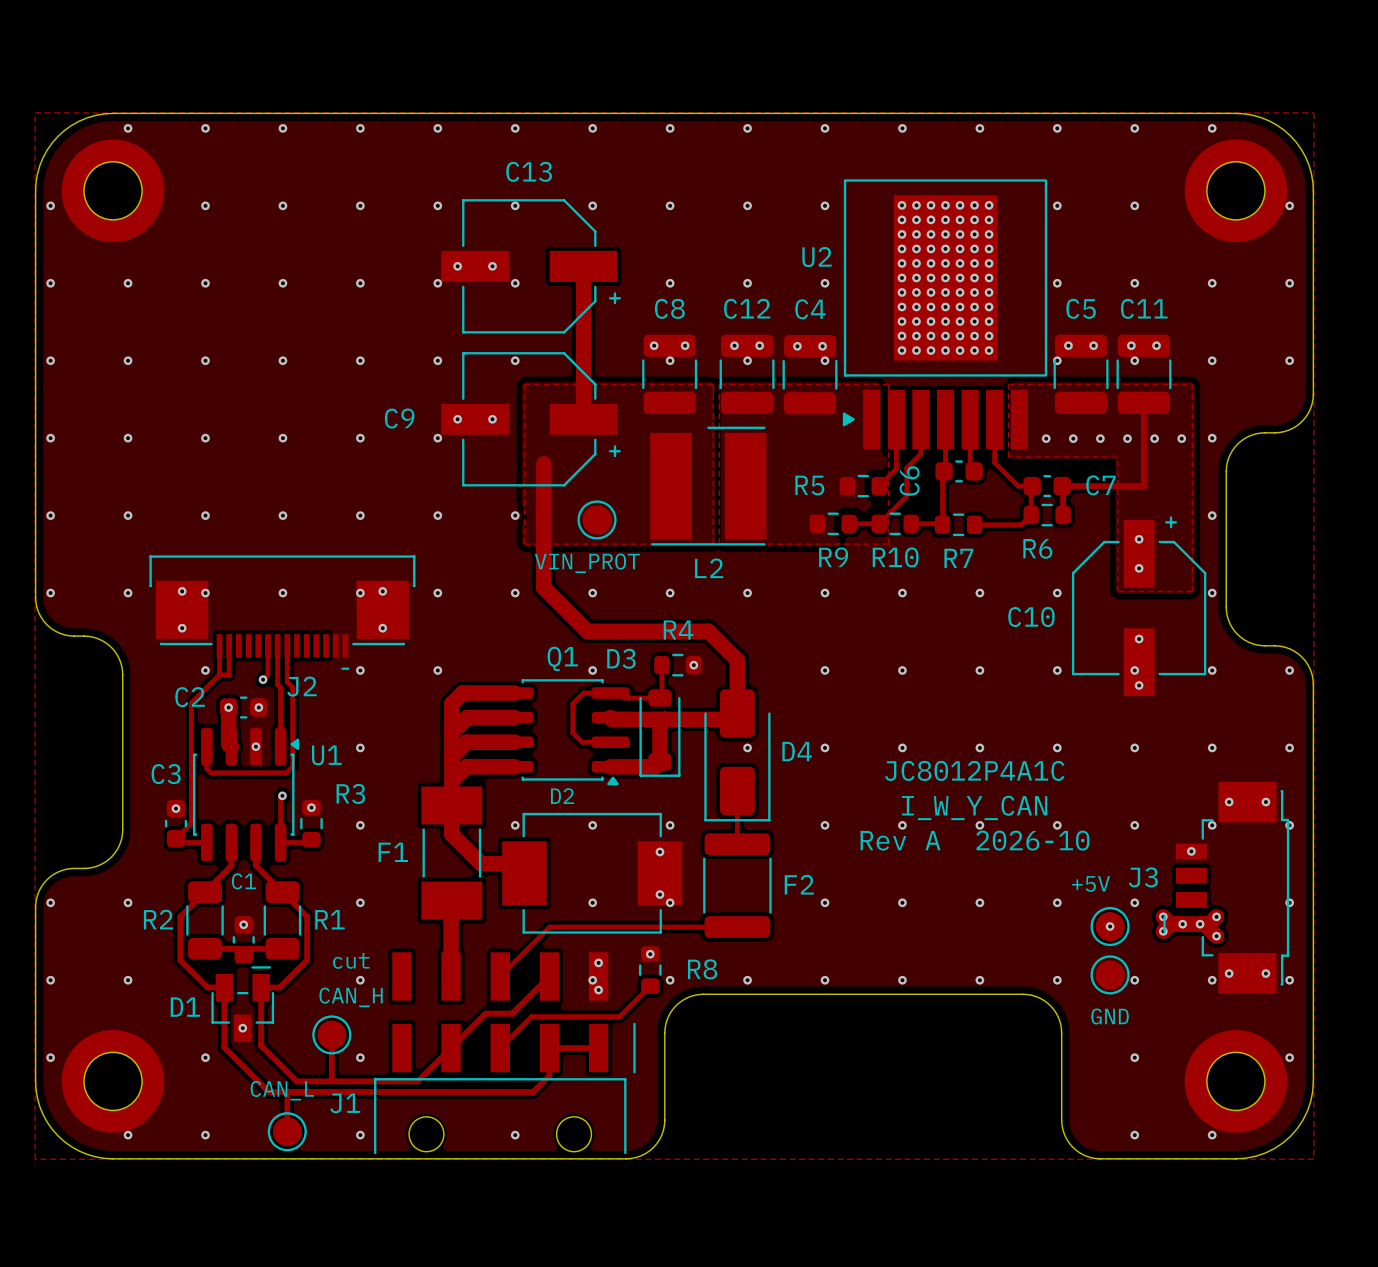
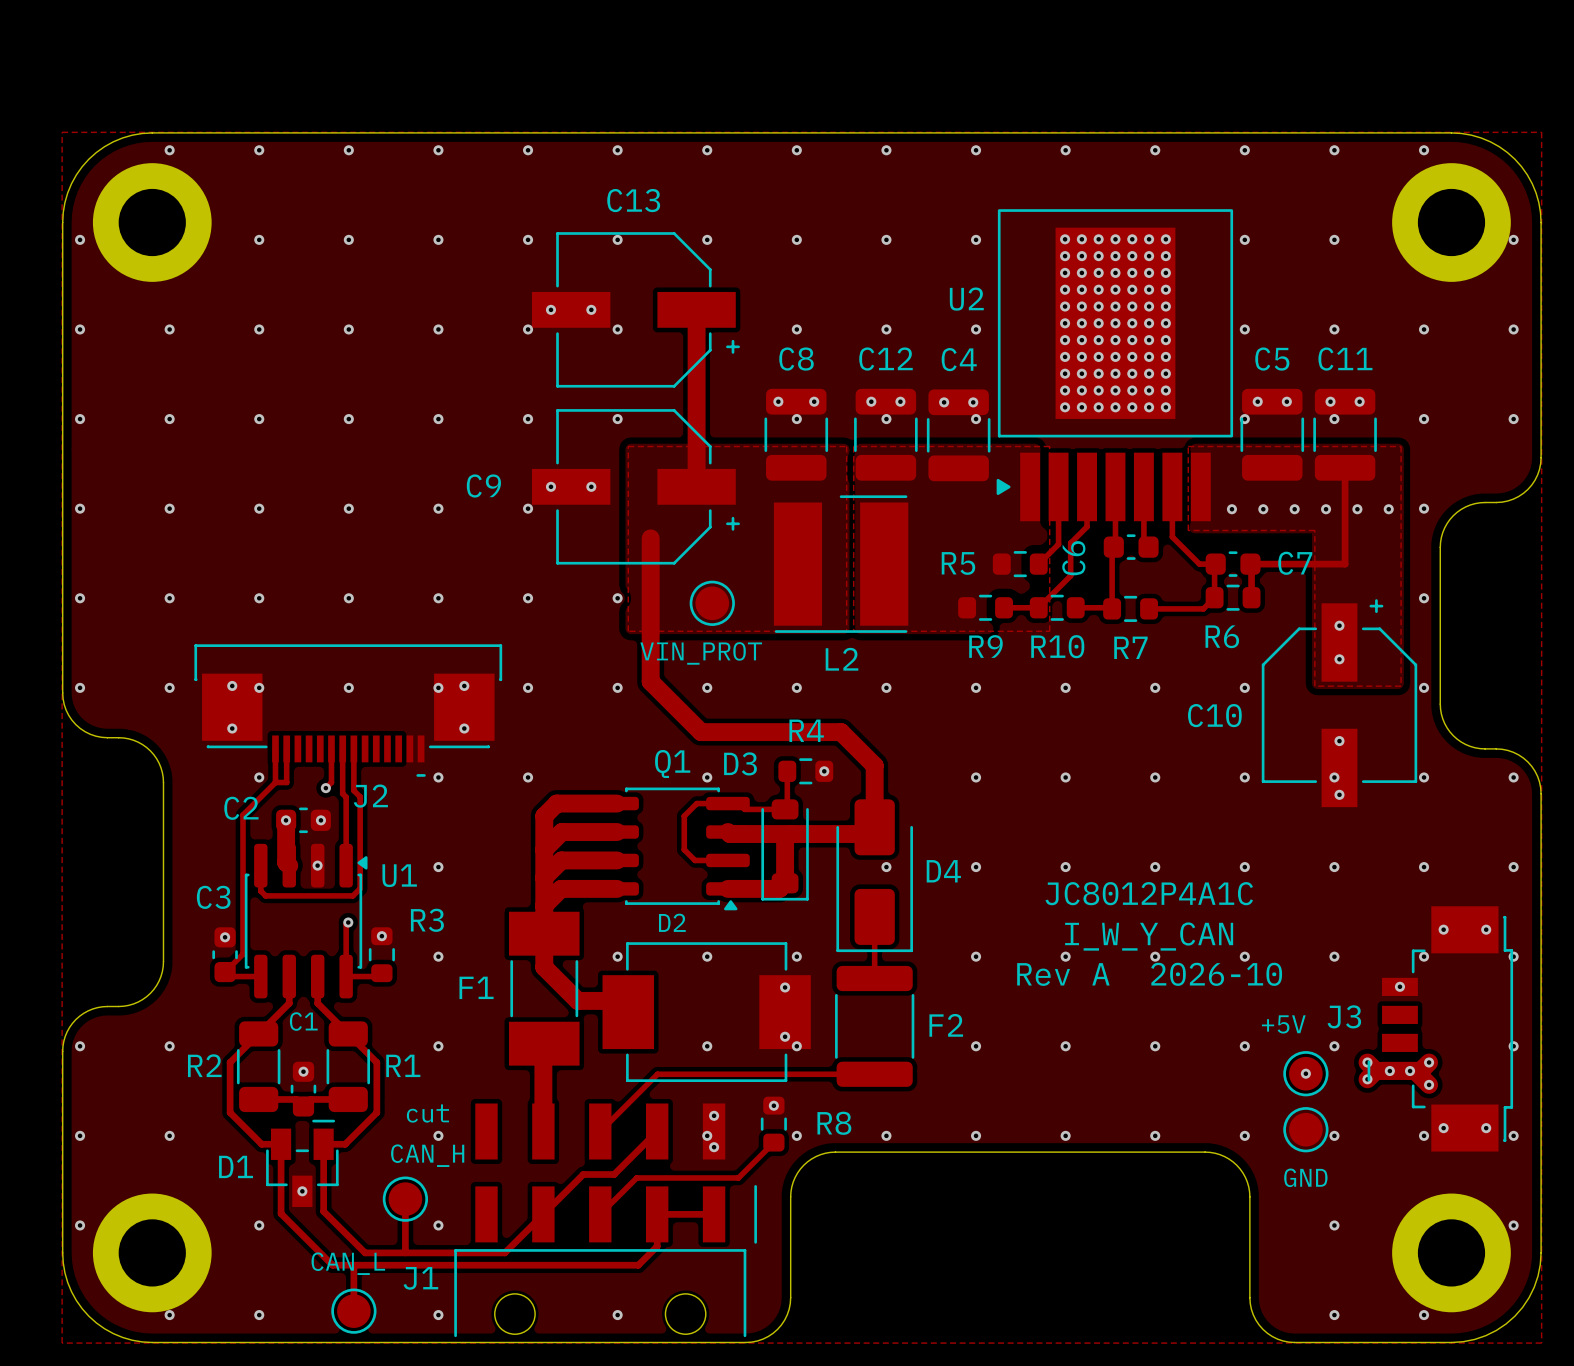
part footprint: [61, 139, 165, 243] -> [92, 163, 212, 282]
part footprint: [1184, 139, 1288, 243] -> [1392, 163, 1511, 282]
part footprint: [61, 1030, 165, 1133] -> [92, 1193, 212, 1313]
part footprint: [1184, 1030, 1288, 1133] -> [1392, 1193, 1511, 1313]

